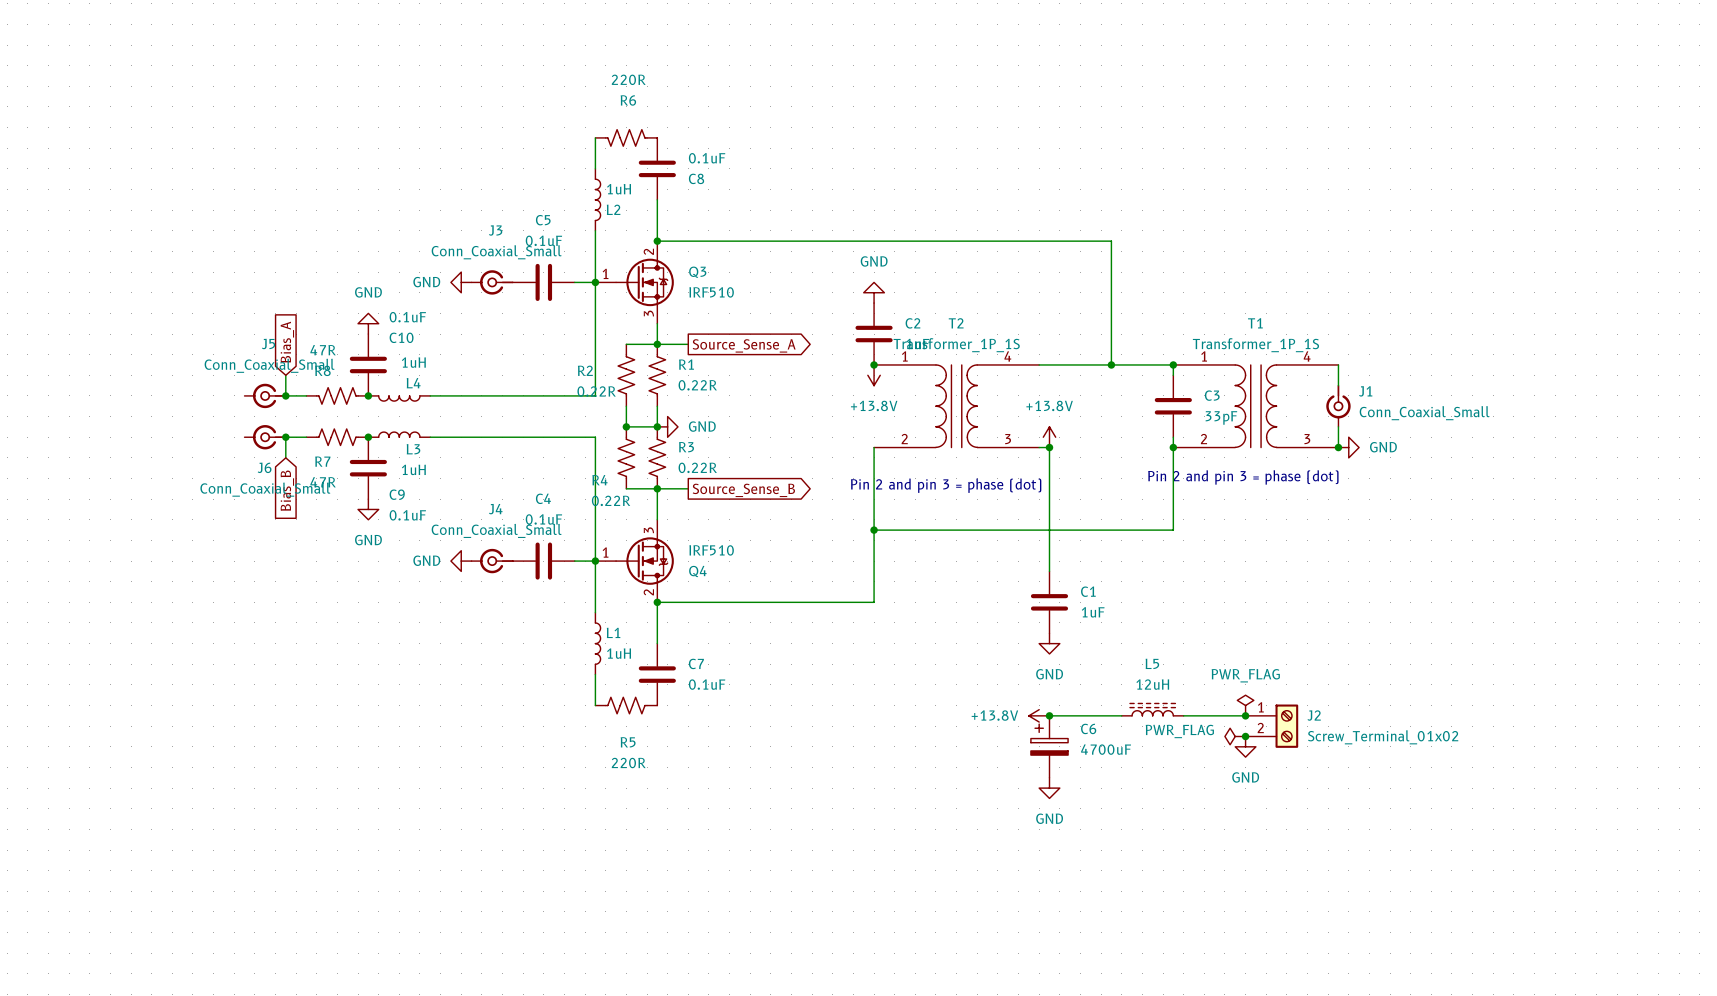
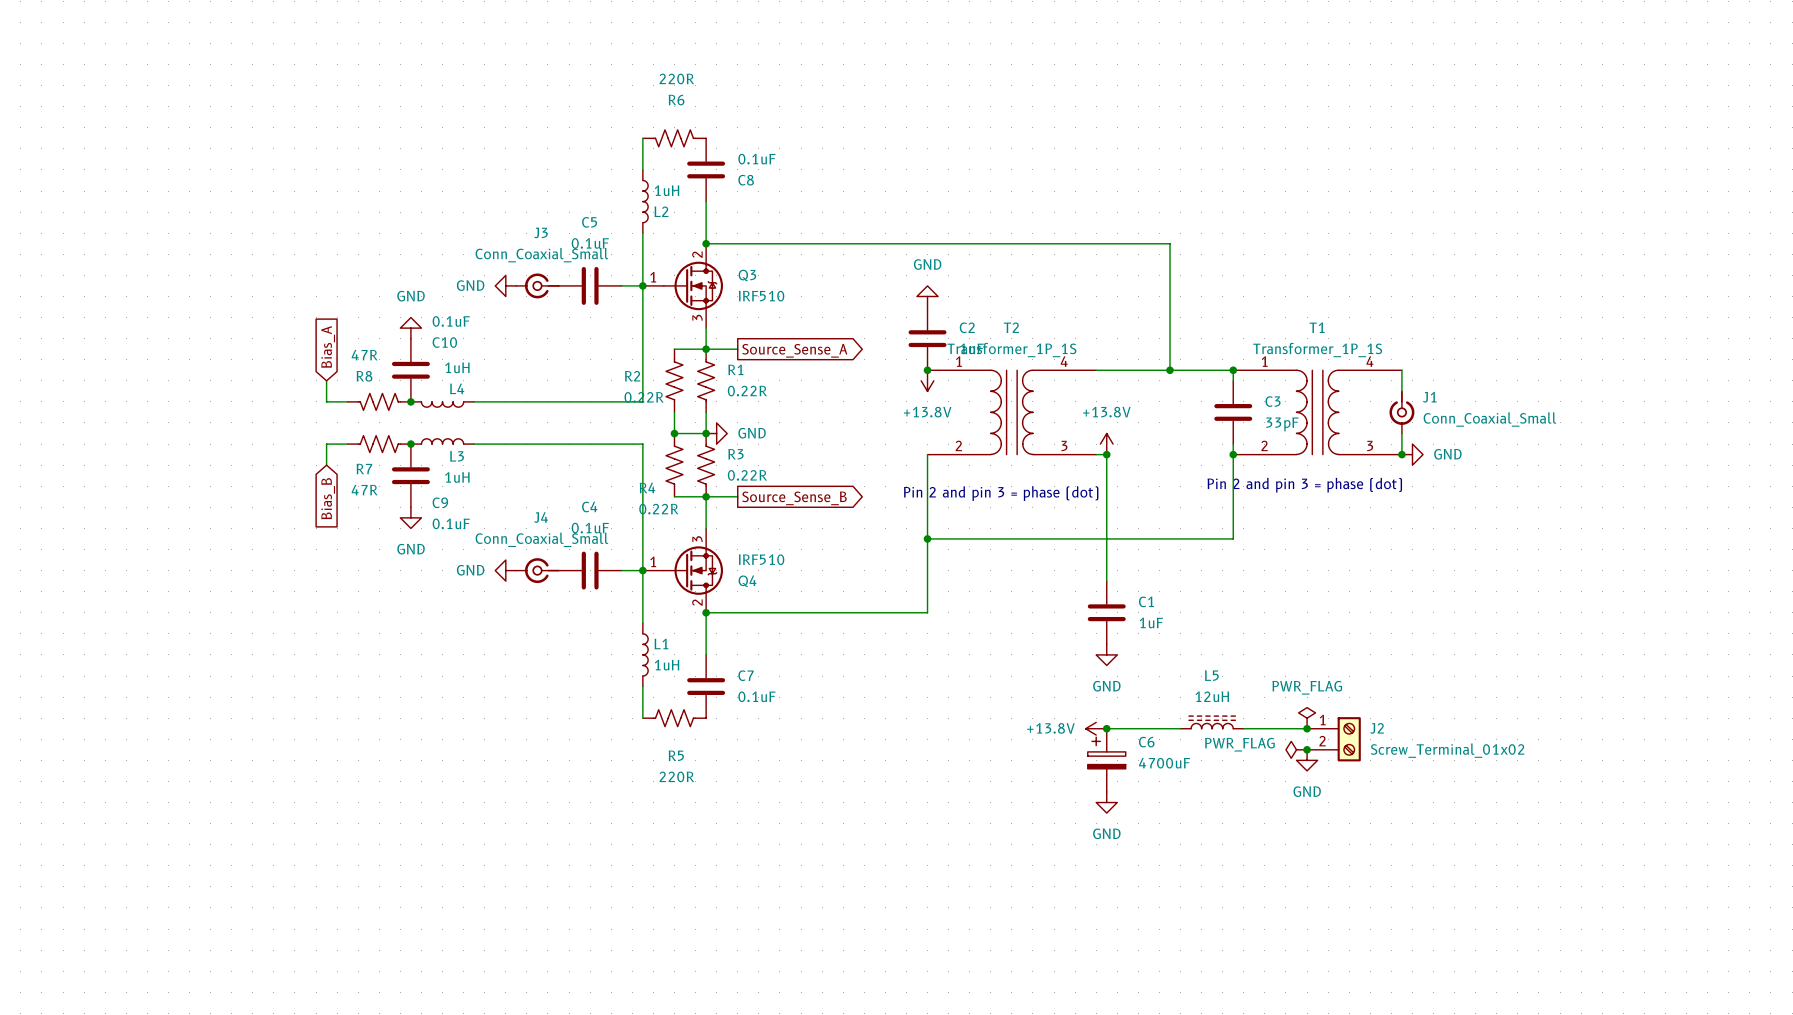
J5: Conn_Coaxial_Small (265, 395) -> none
junction: (285, 395) -> none
J6: Conn_Coaxial_Small (265, 437) -> none
junction: (285, 437) -> none

